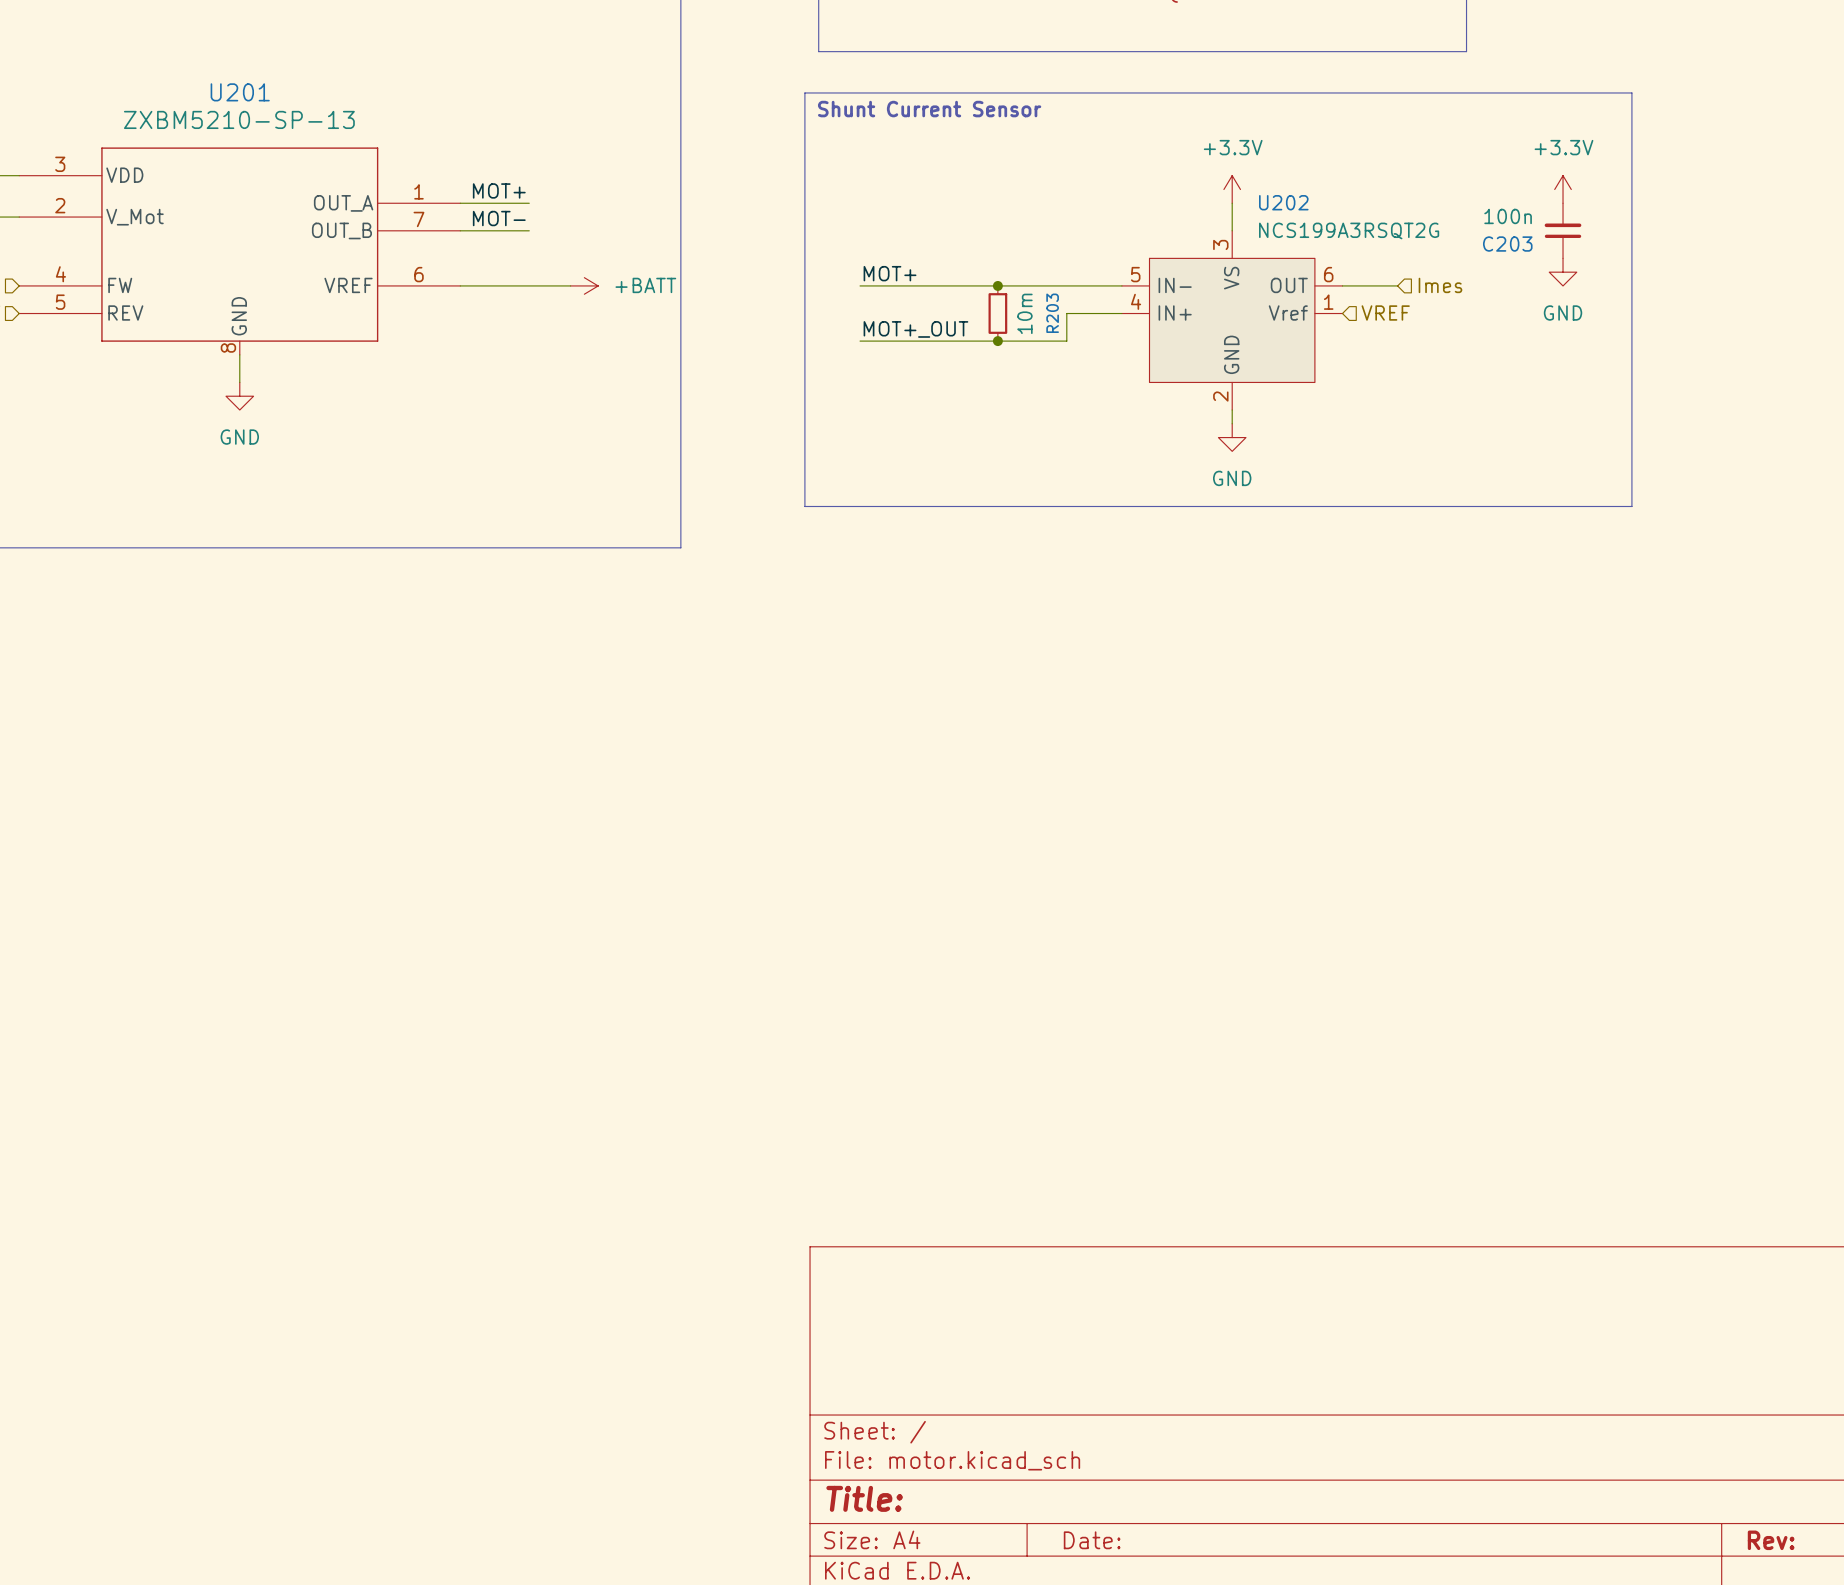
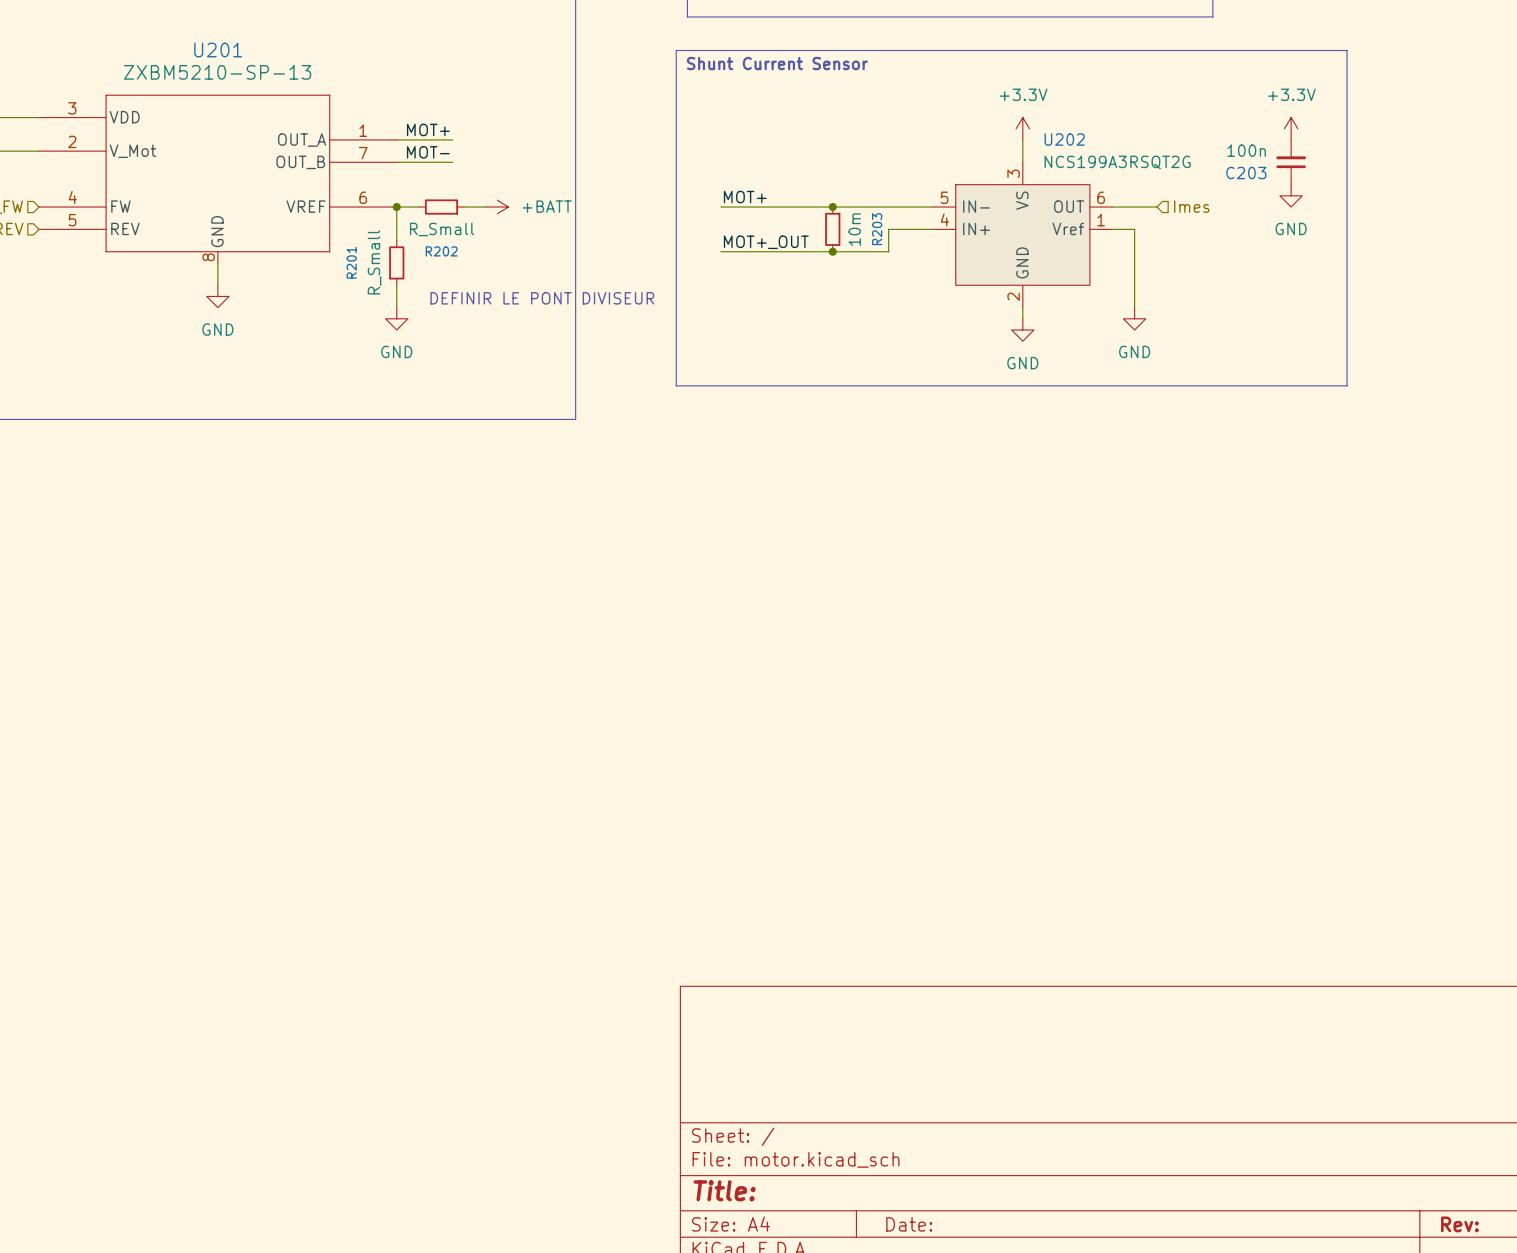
wire: none -> (396, 207) (396, 240)
junction: none -> (396, 207)
wire: (487, 285) (543, 285) -> none
R202: none -> R_Small (441, 207)
wire: none -> (1112, 229) (1134, 229) (1134, 307)
hierarchical label: VREF (1385, 313) -> none
R201: none -> R_Small (396, 262)
wire: none -> (396, 285) (396, 307)
text: none -> DEFINIR LE PONT DIVISEUR (542, 298)
power symbol: none -> GND (396, 318)
power symbol: none -> GND (1134, 318)

